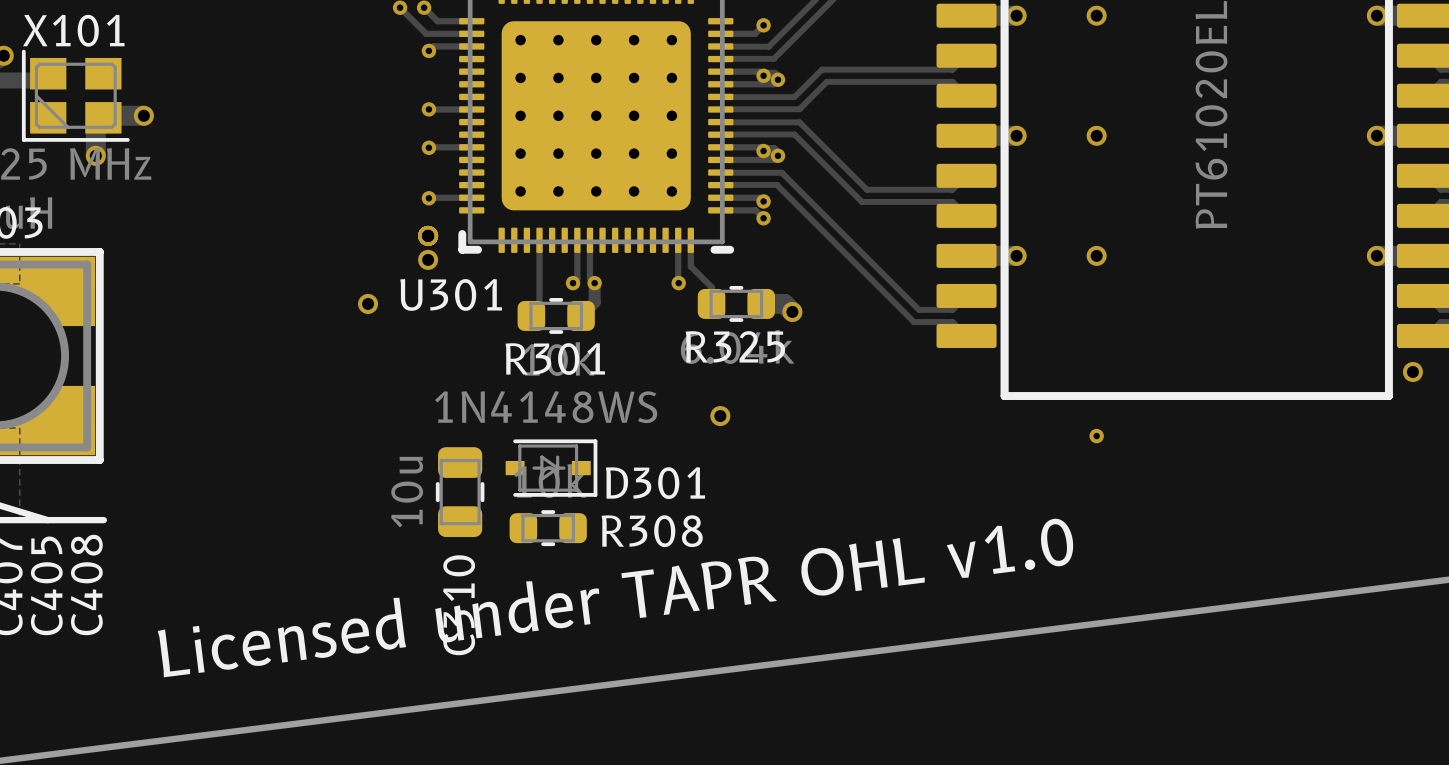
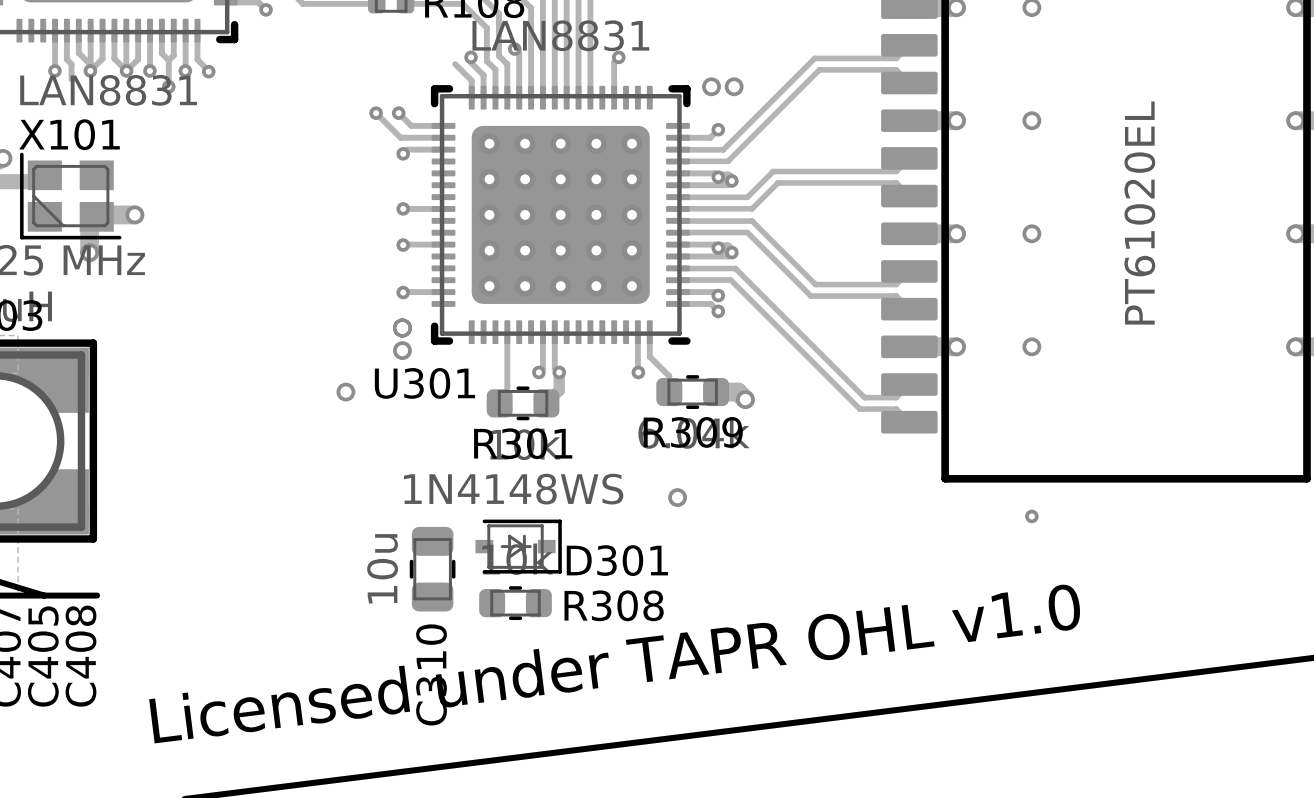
R325 name: R325 (735, 346) -> R309 (693, 432)

